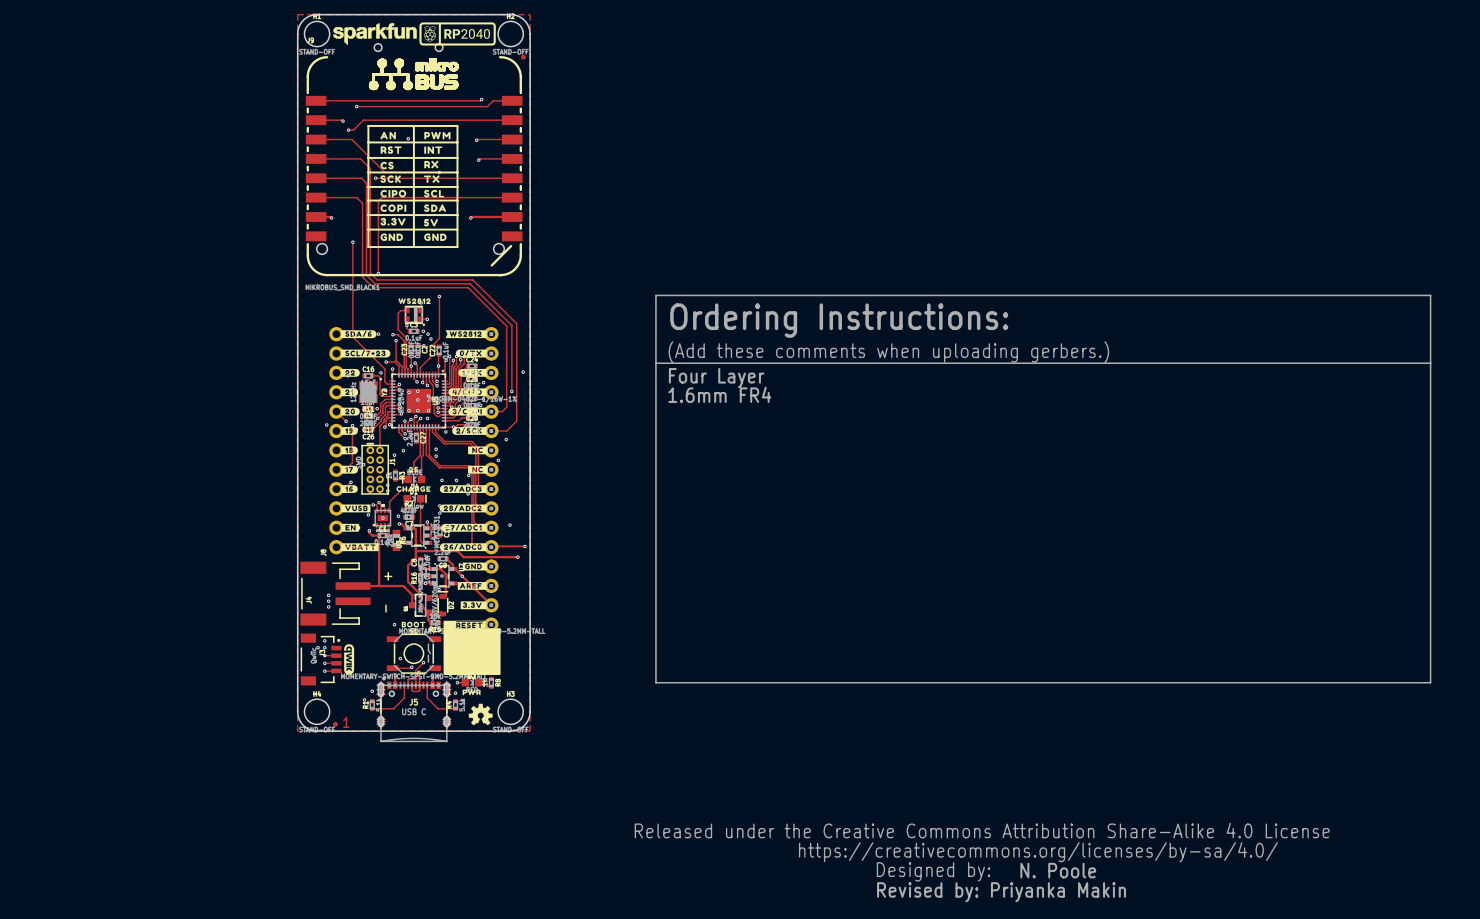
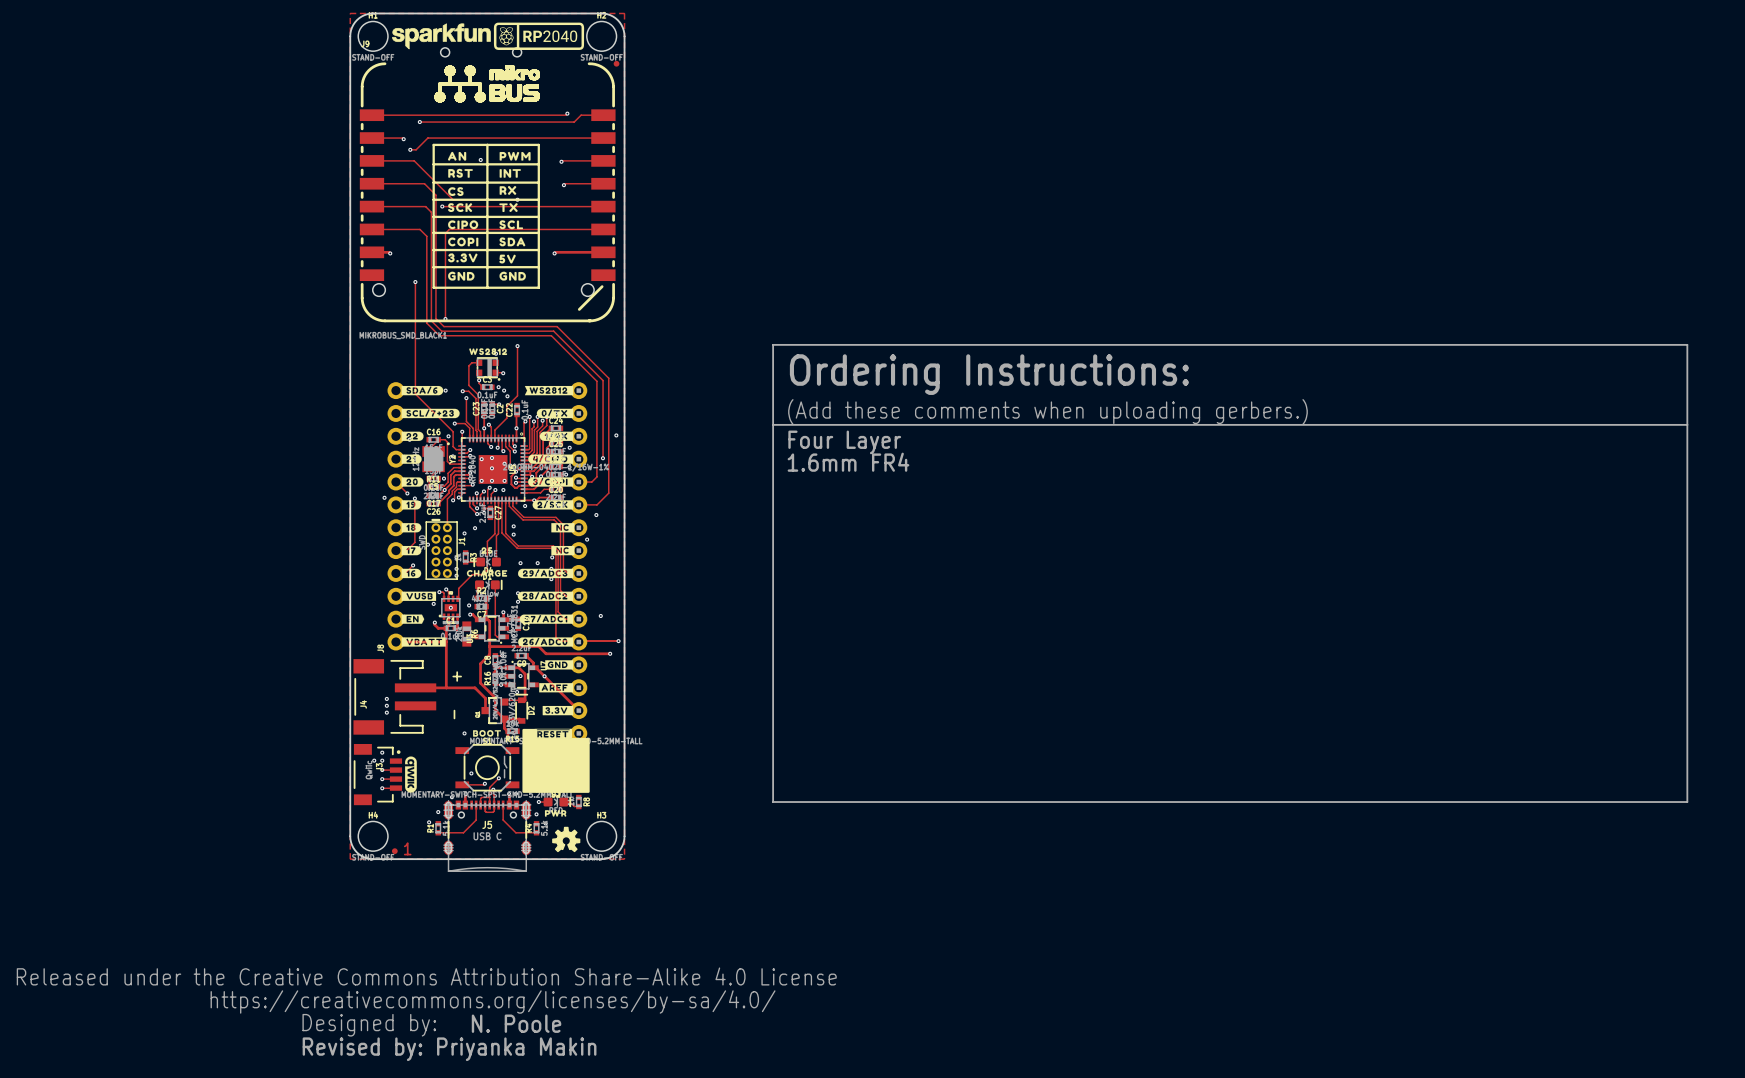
drawing: none -> [16, 967, 837, 1037]
drawing: [634, 822, 1330, 882] -> none
text: none -> N. Poole (516, 1023)
text: N. Poole (1058, 870) -> none
text: none -> Revised by: Priyanka Makin (449, 1049)
text: Revised by: Priyanka Makin (1001, 892) -> none

